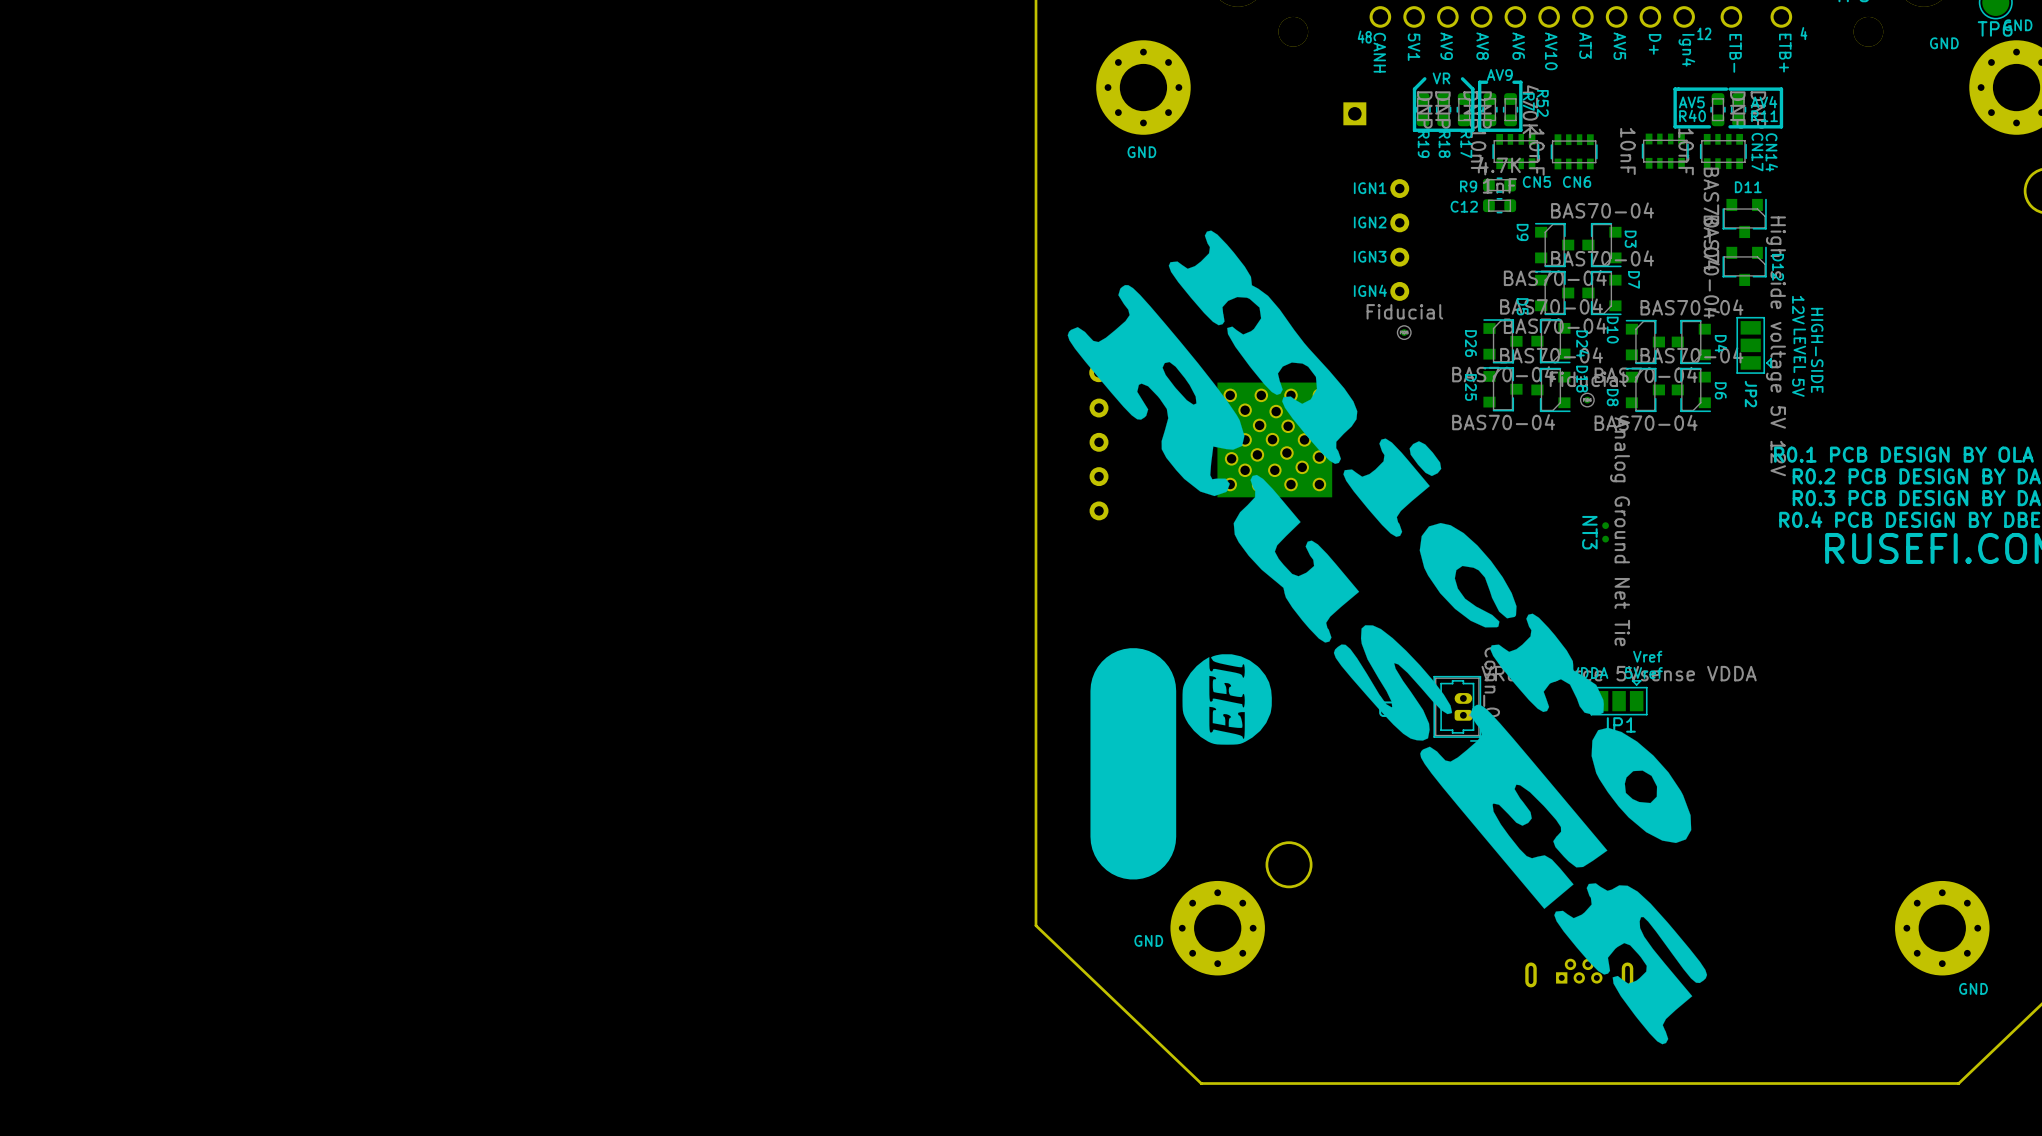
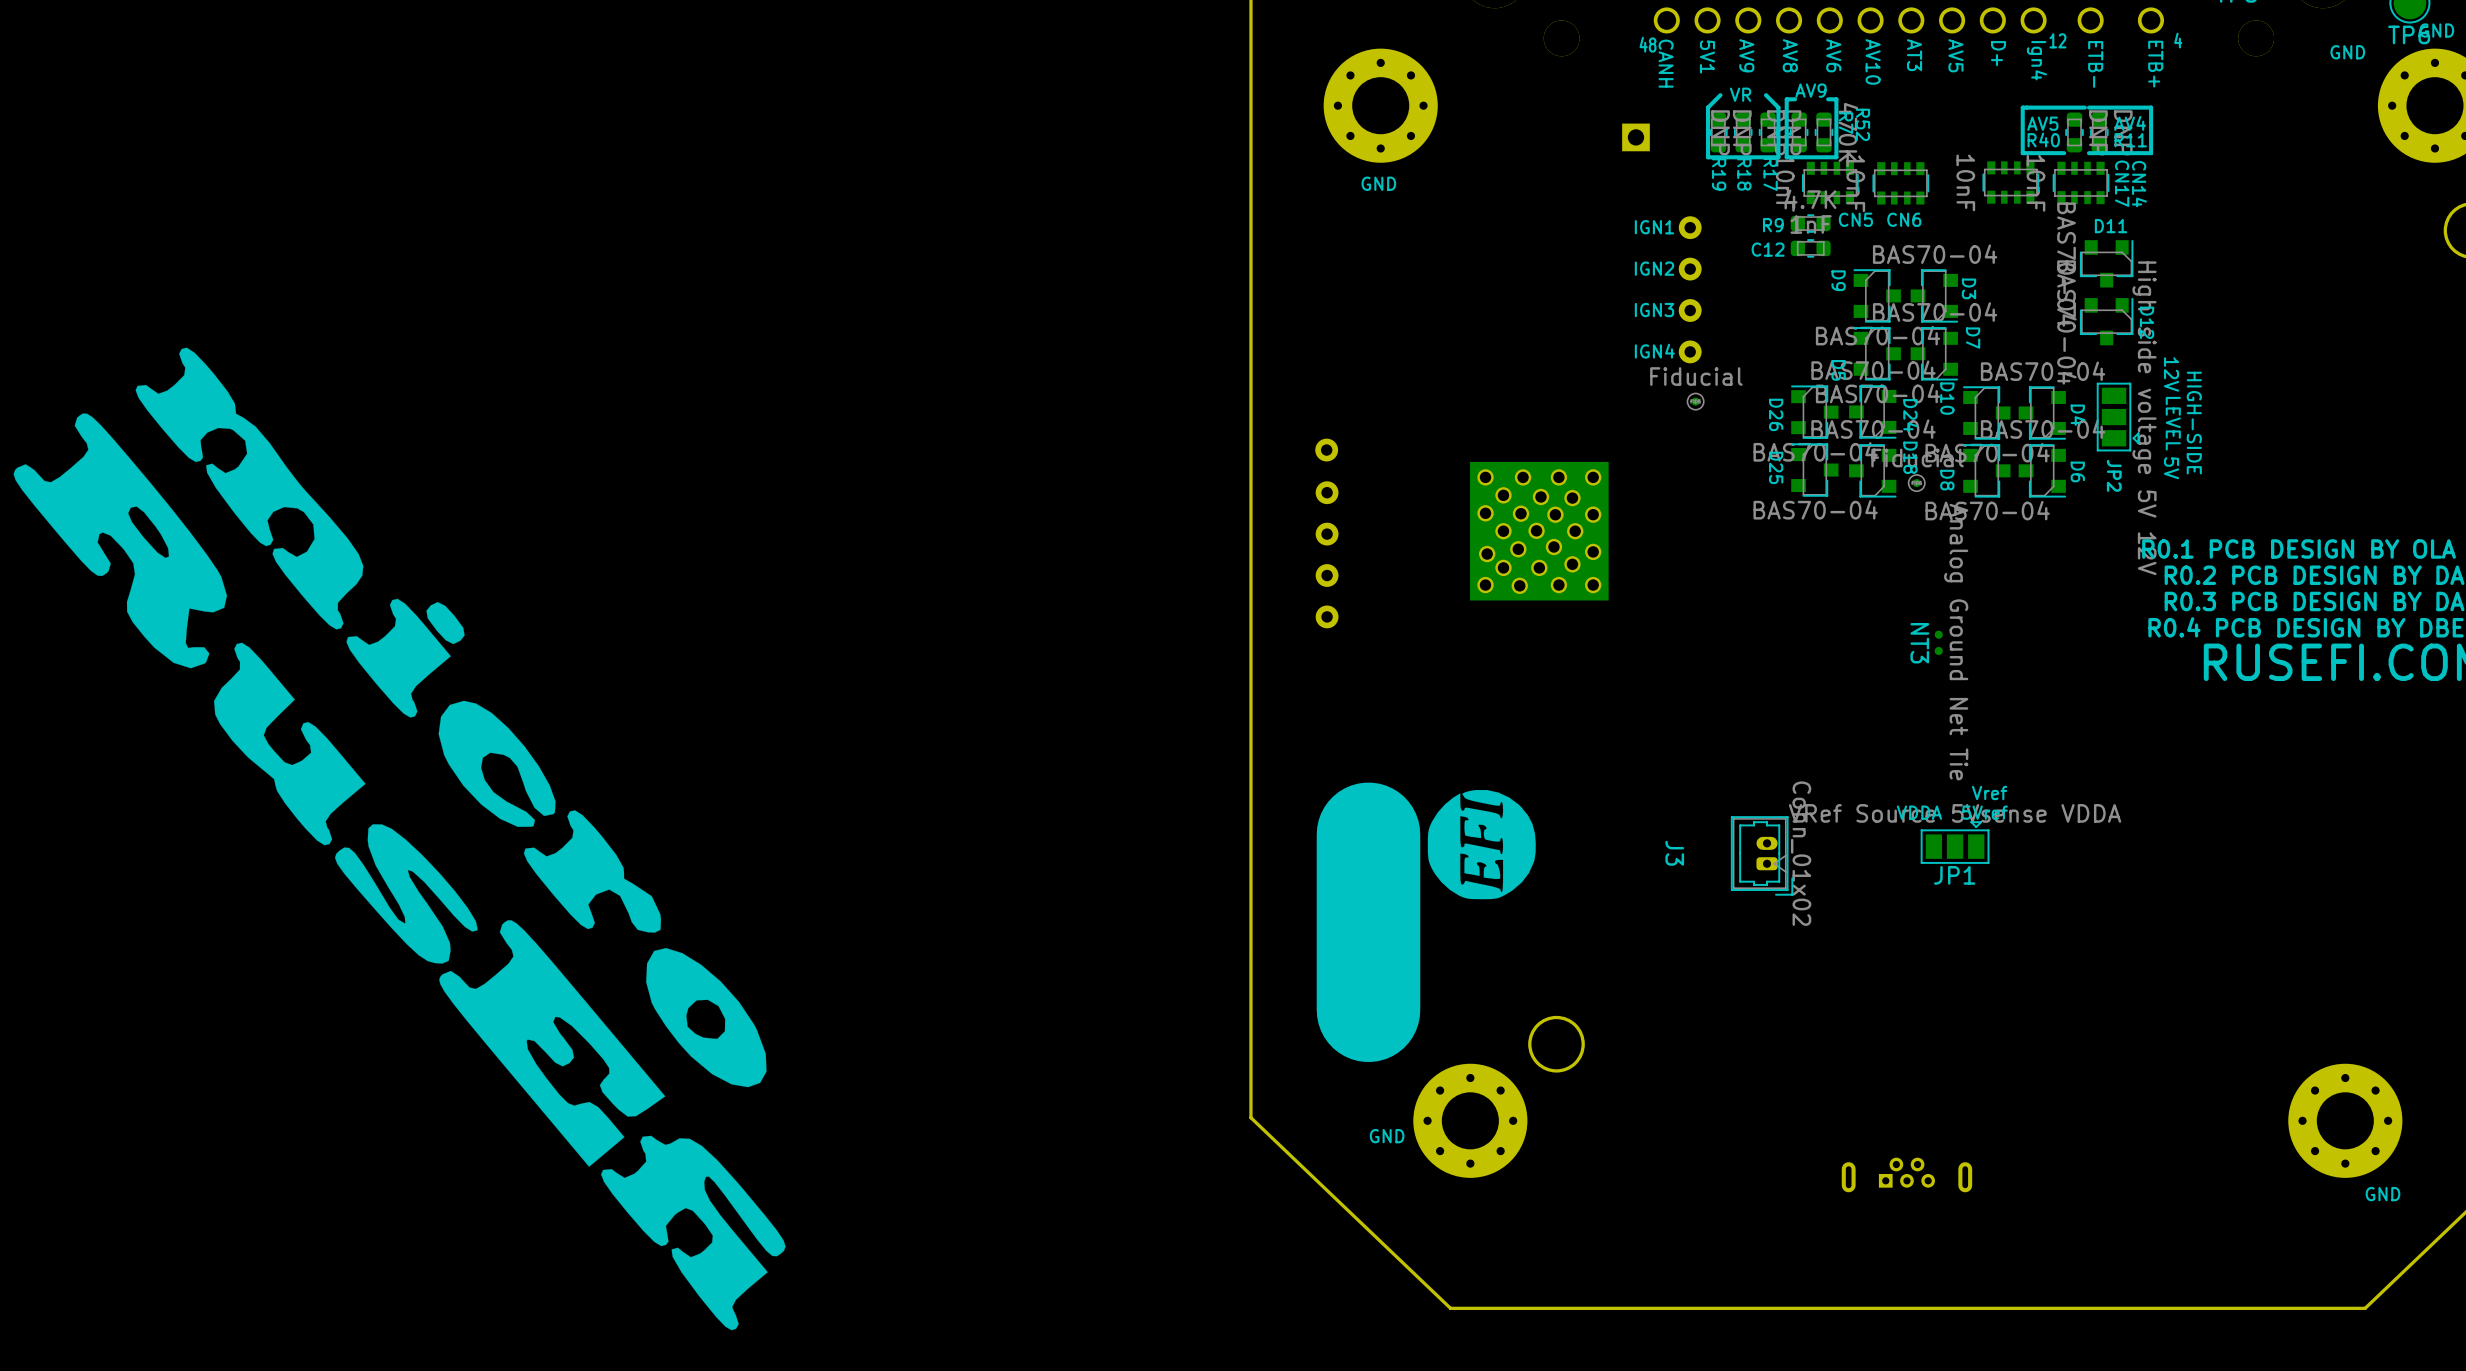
drawing: [1067, 230, 1708, 1045] -> none
drawing: none -> [13, 347, 786, 1331]

